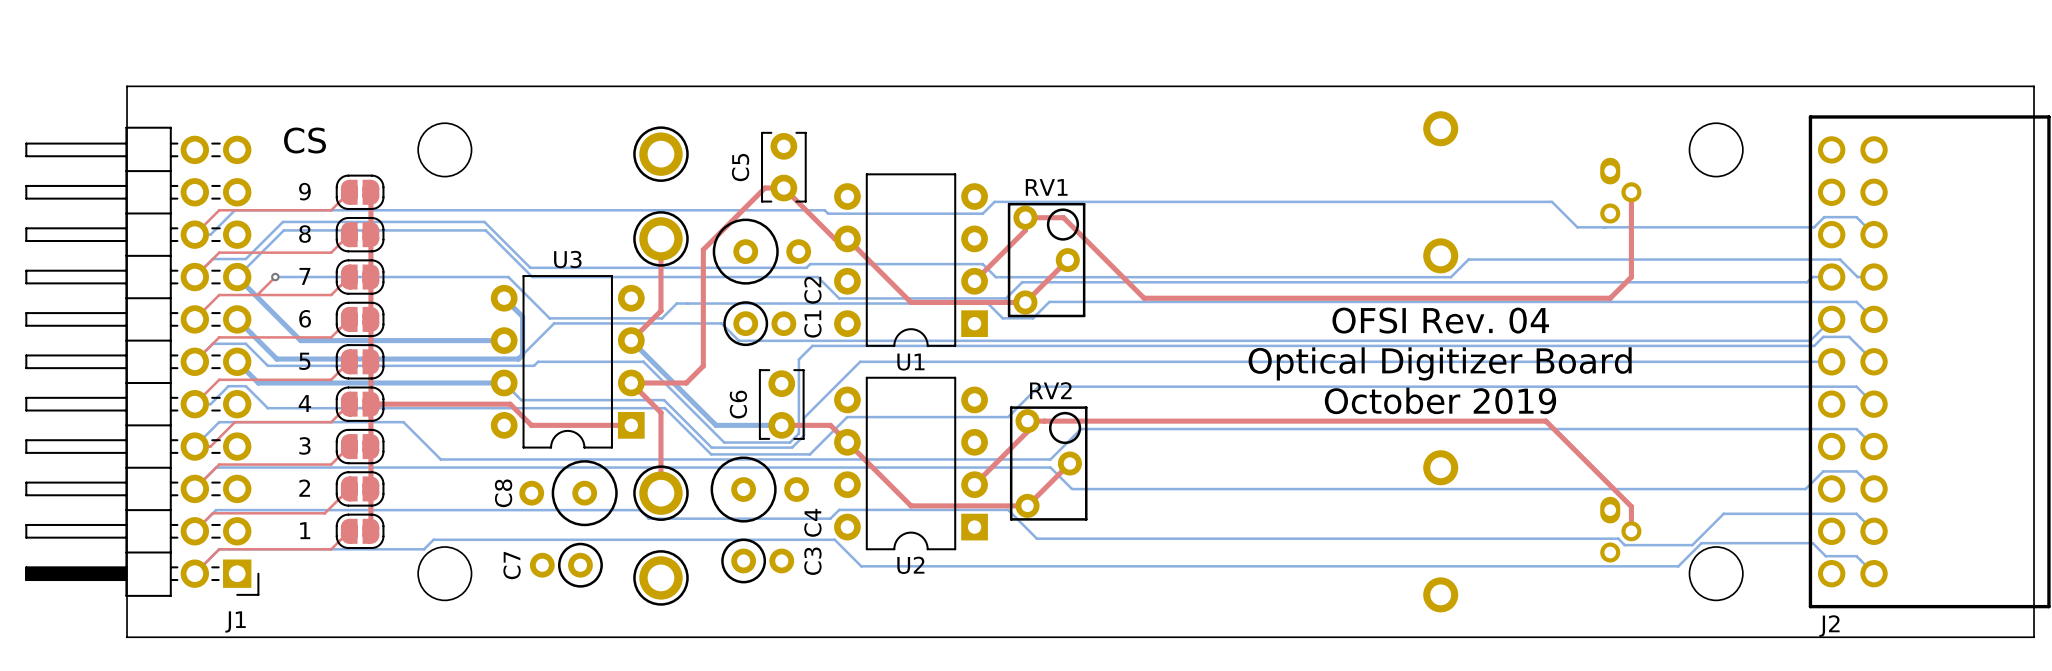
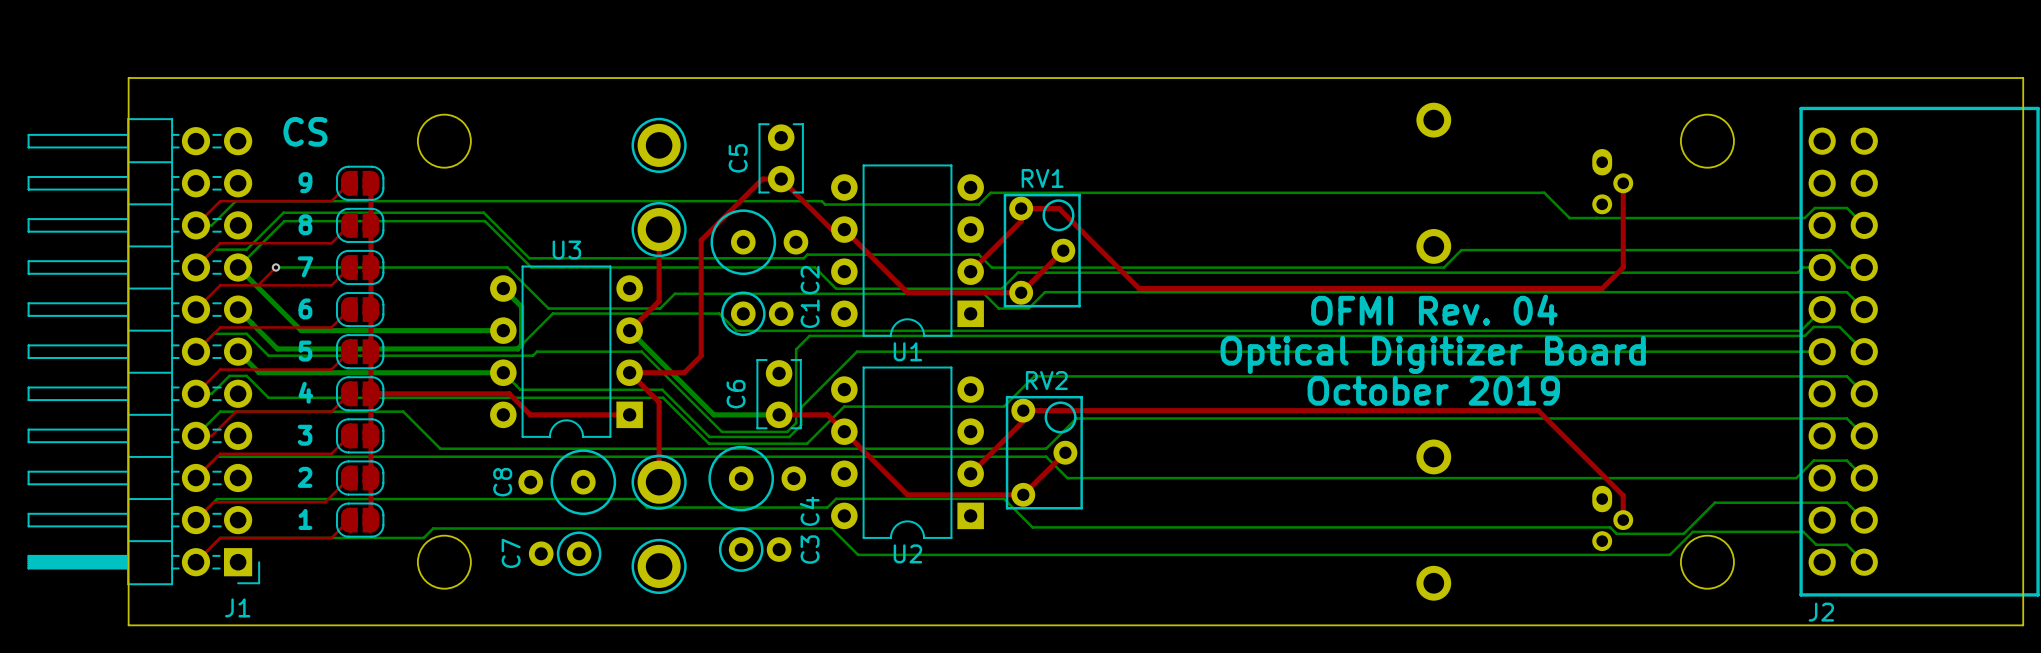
text: OFSI Rev. 04 (1440, 320) -> OFMI Rev. 04 (1434, 310)

